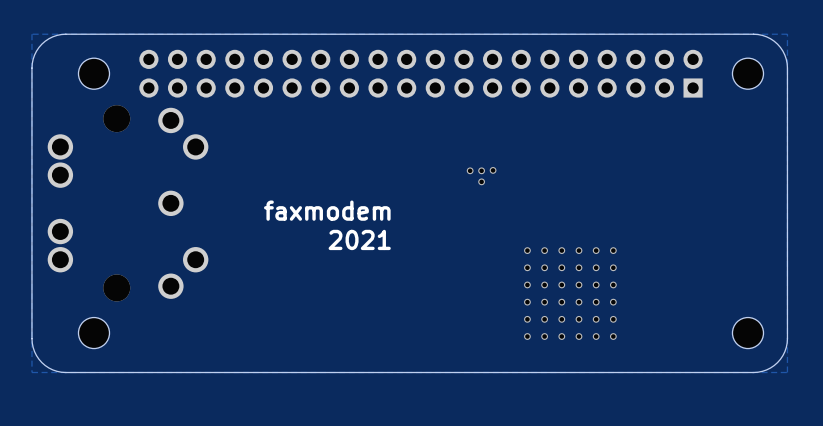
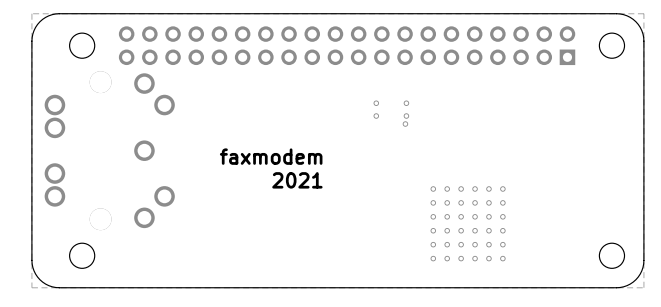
via: none -> (376, 103)
via: none -> (406, 103)
via: none -> (376, 116)
via: none -> (406, 116)
via: (470, 170) -> none
via: (481, 170) -> none
via: (481, 181) -> none

